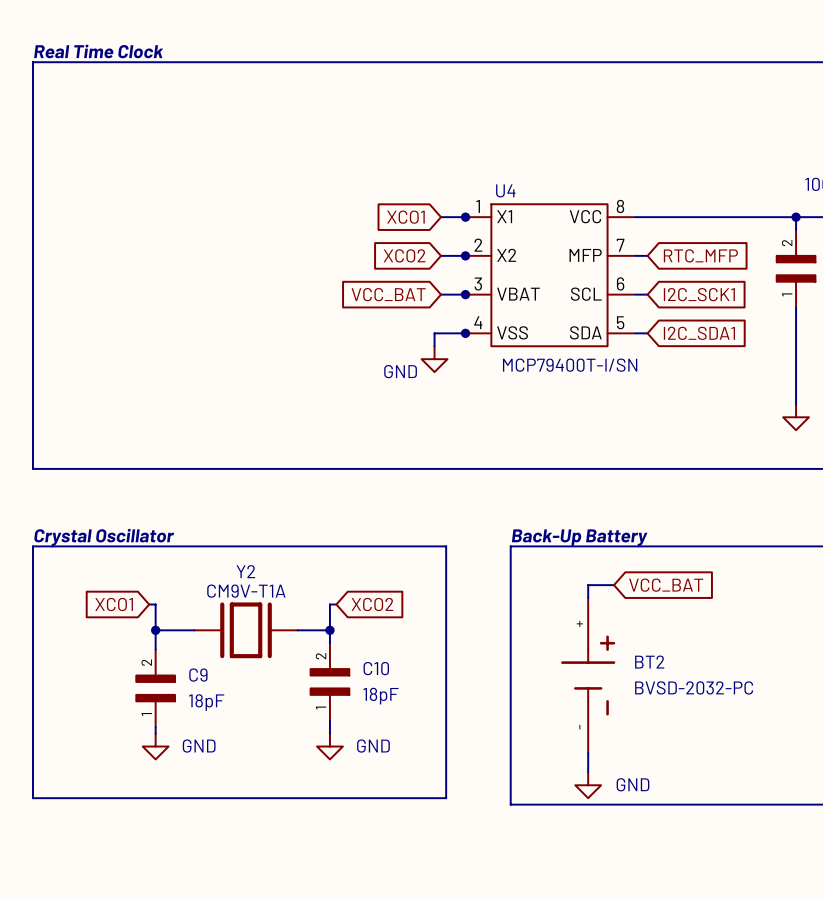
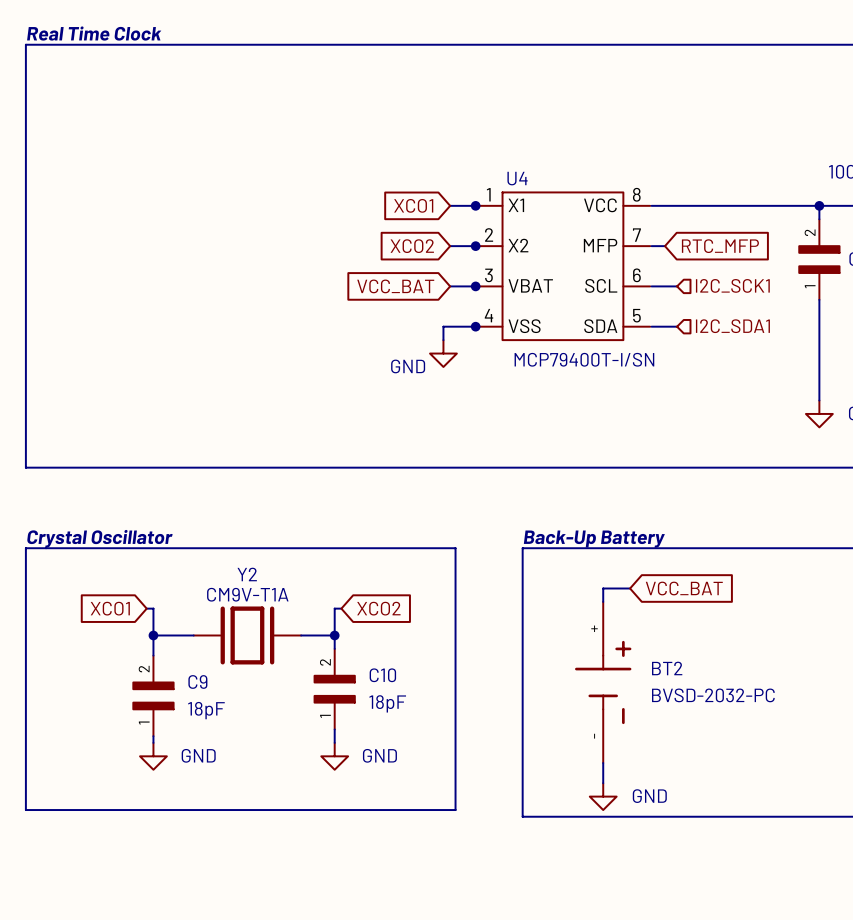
wire: none -> (664, 286) (677, 286)
global label: I2C_SCK1 (699, 294) -> none
hierarchical label: none -> I2C_SCK1 (732, 285)
hierarchical label: none -> I2C_SDA1 (732, 326)
wire: none -> (664, 326) (677, 326)
global label: I2C_SDA1 (699, 333) -> none

